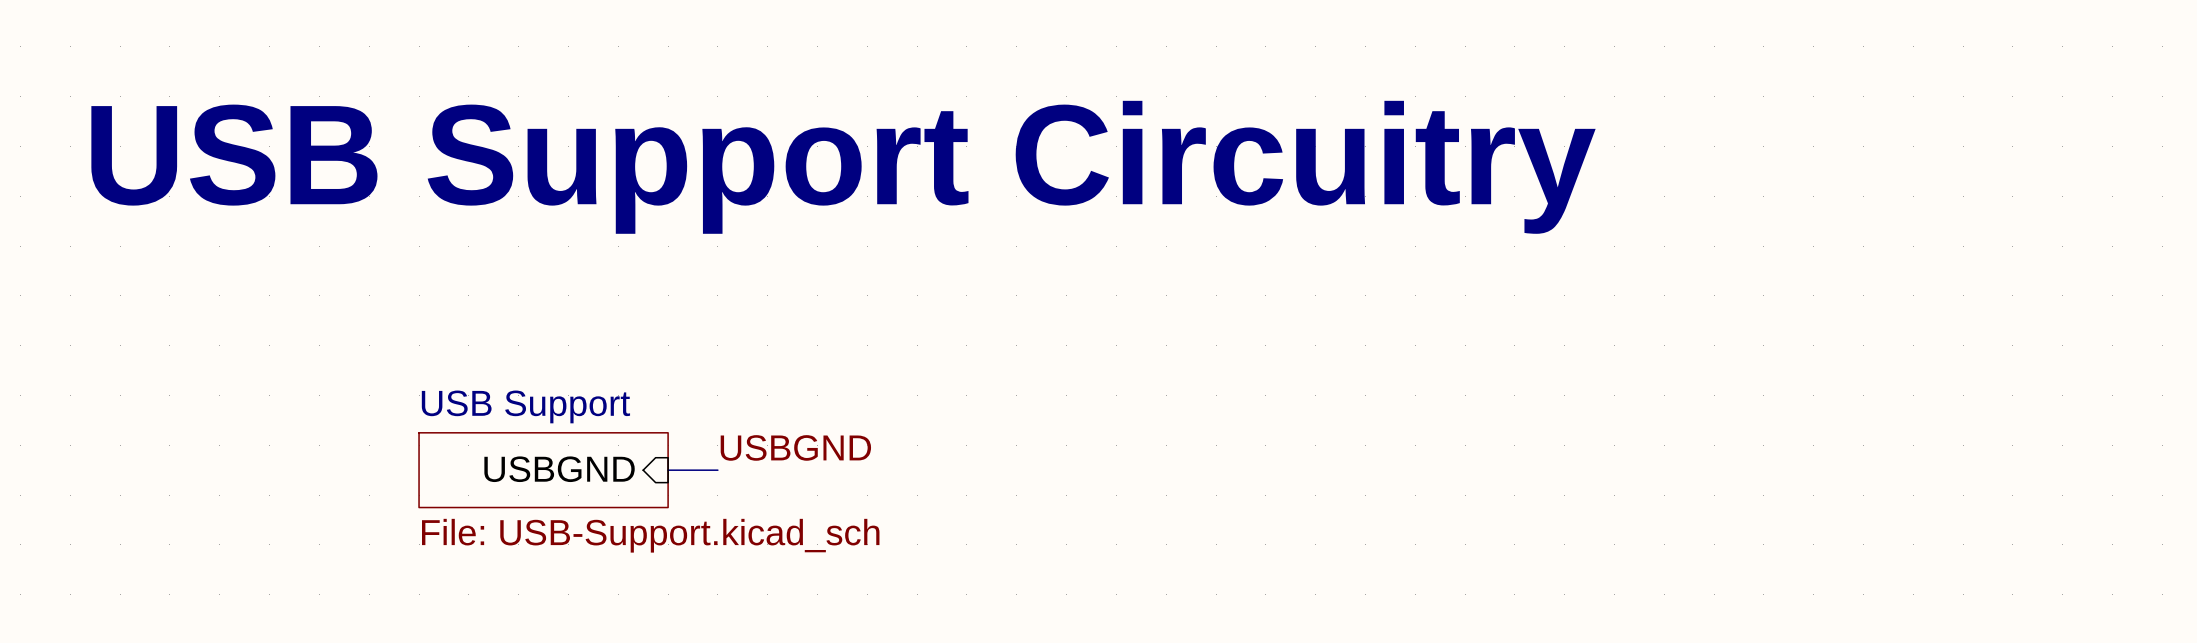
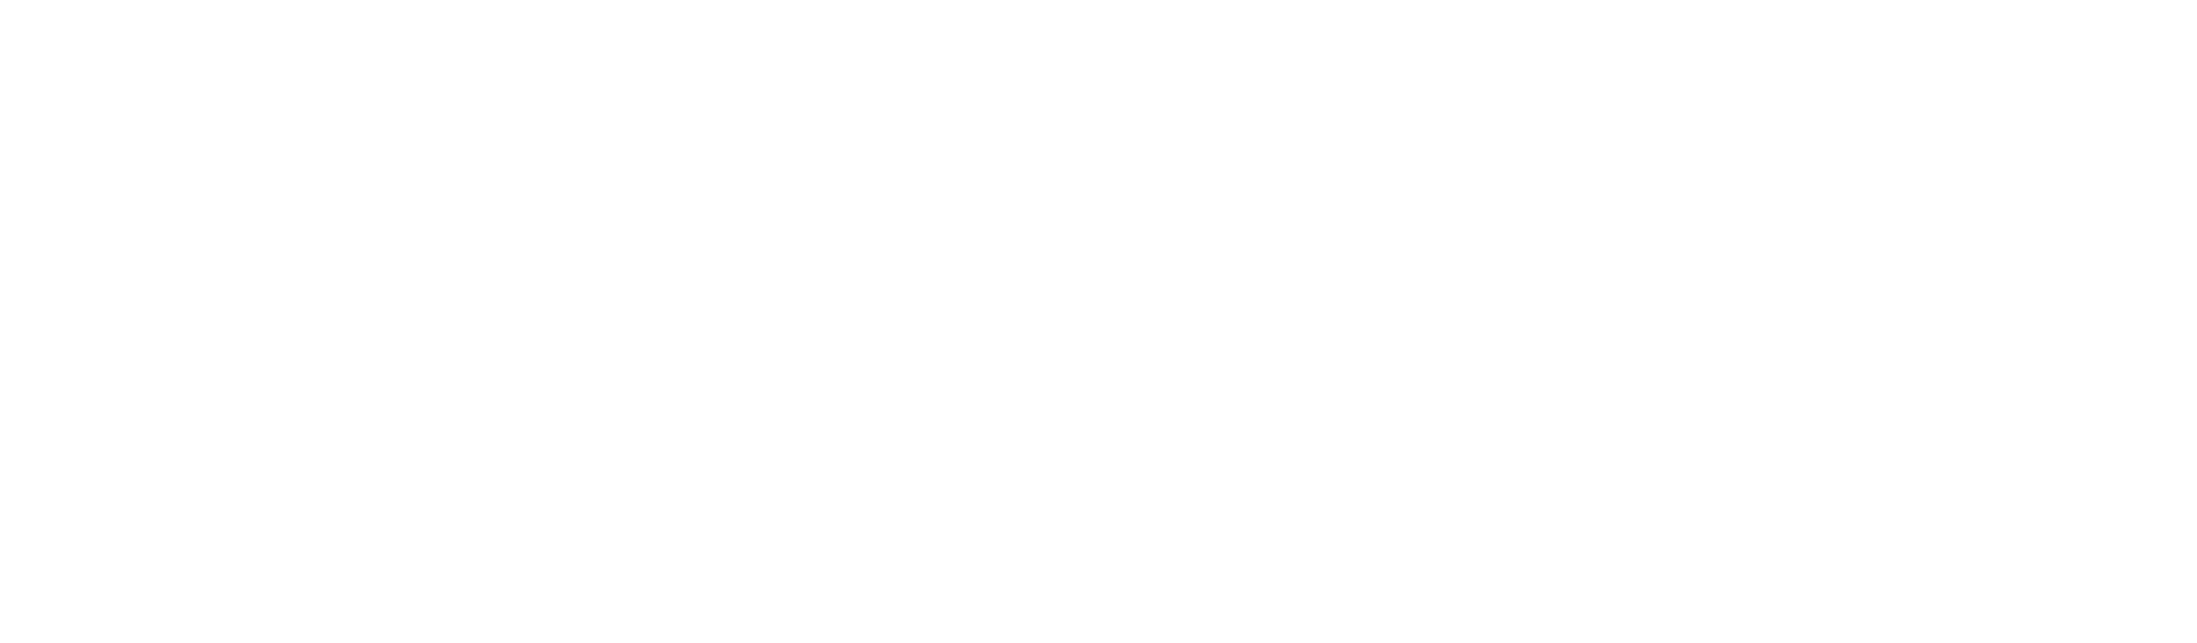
text: USB Support Circuitry (843, 167) -> none
label: USBGND (795, 447) -> none
sheet pin: USBGND (559, 469) -> none
sheet USB Support: File: USB-Support.kicad_sch (543, 470) -> none
wire: (668, 470) (717, 470) -> none

